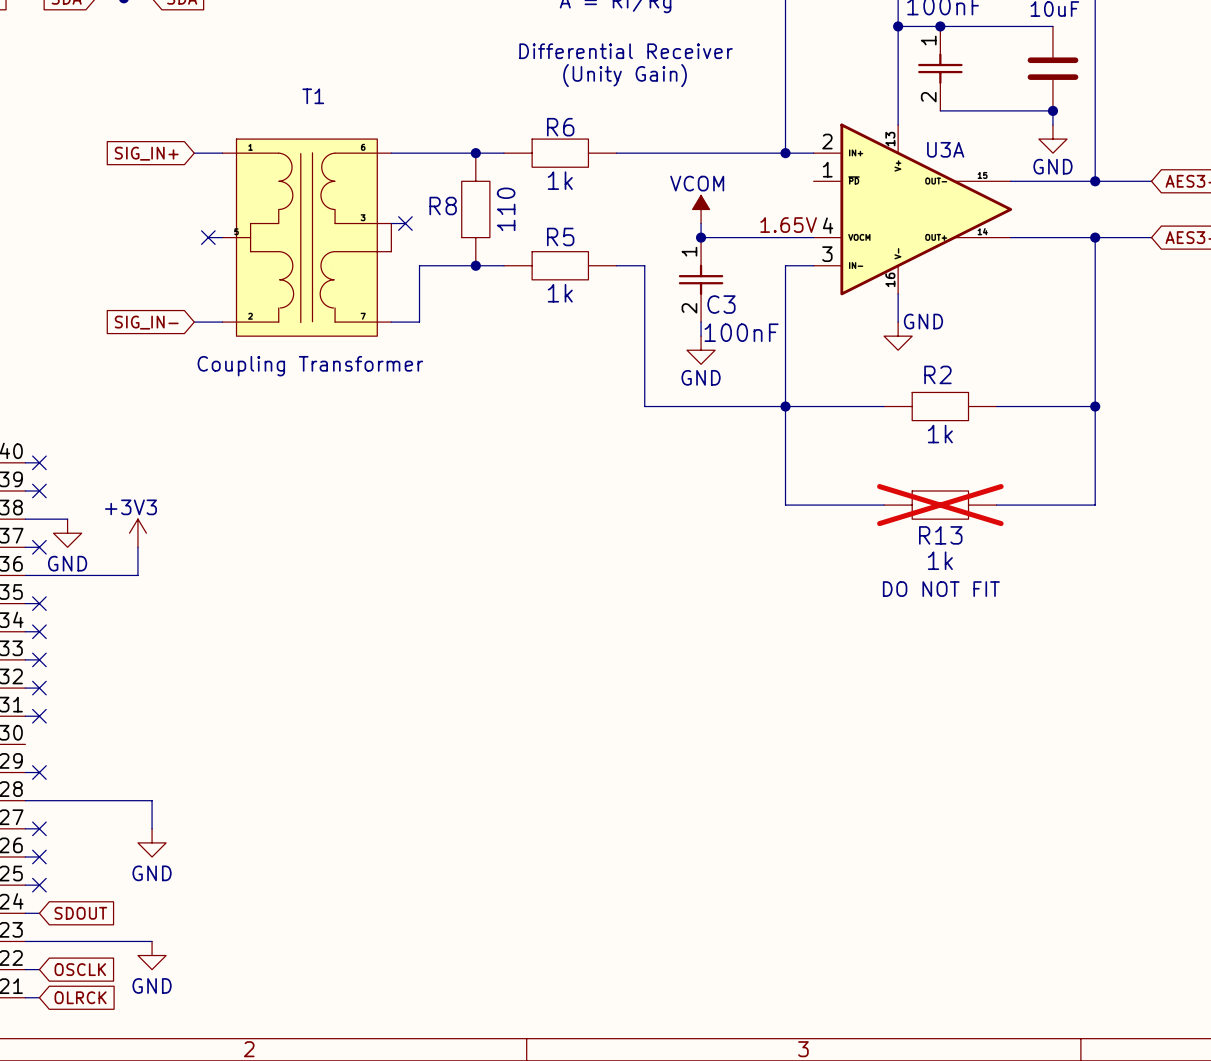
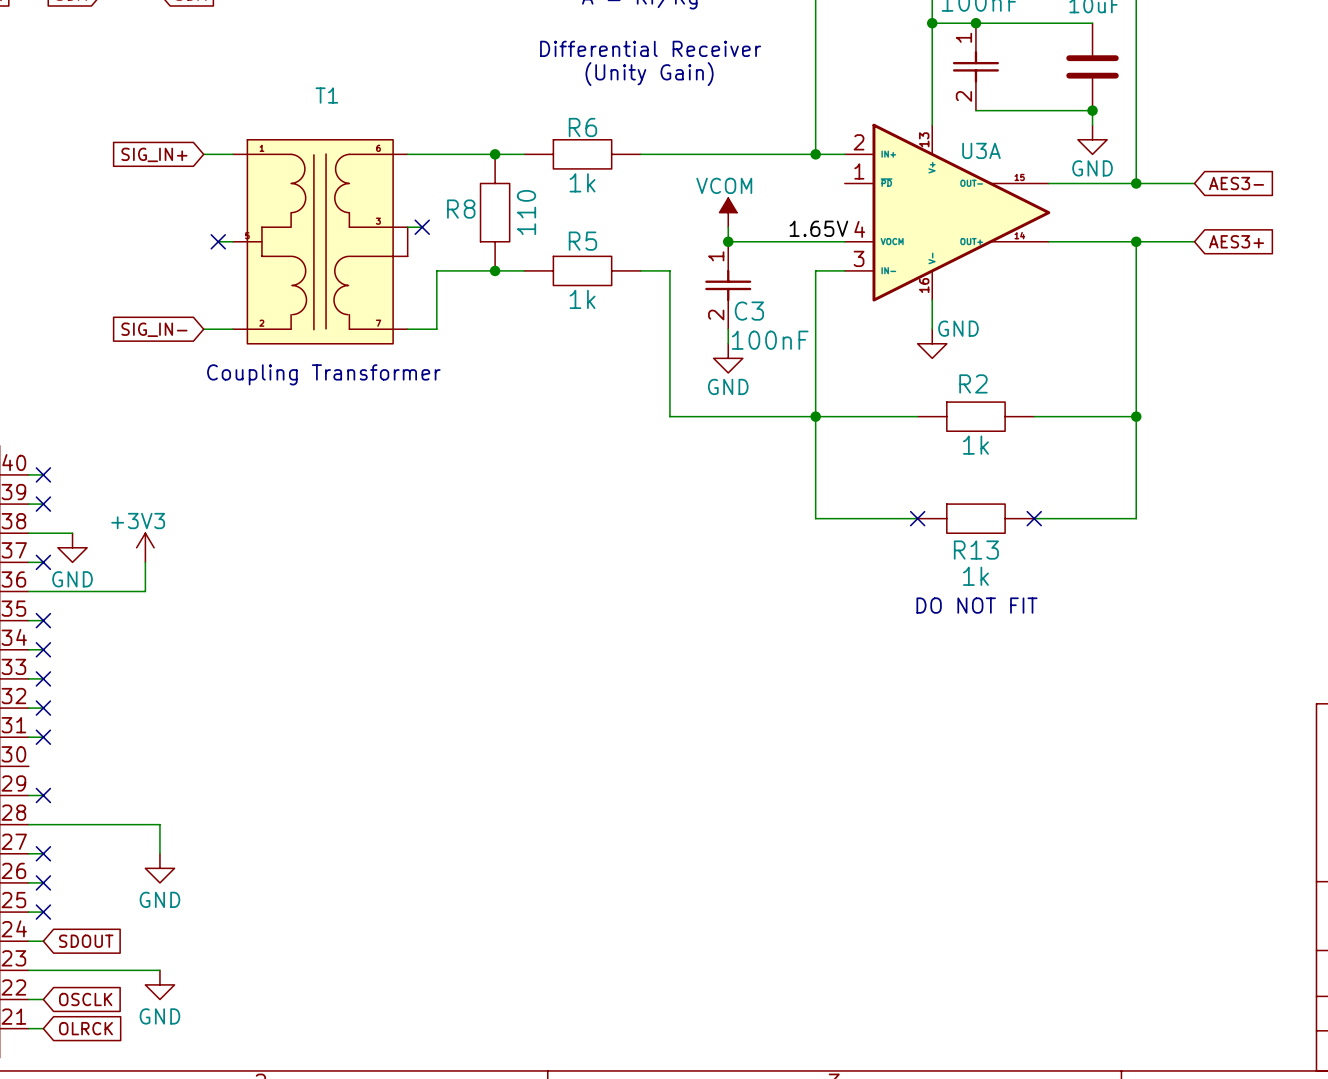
no-connect mark: none -> (917, 518)
R13 do-not-place cross: (940, 505) -> none
no-connect mark: none -> (1034, 518)

